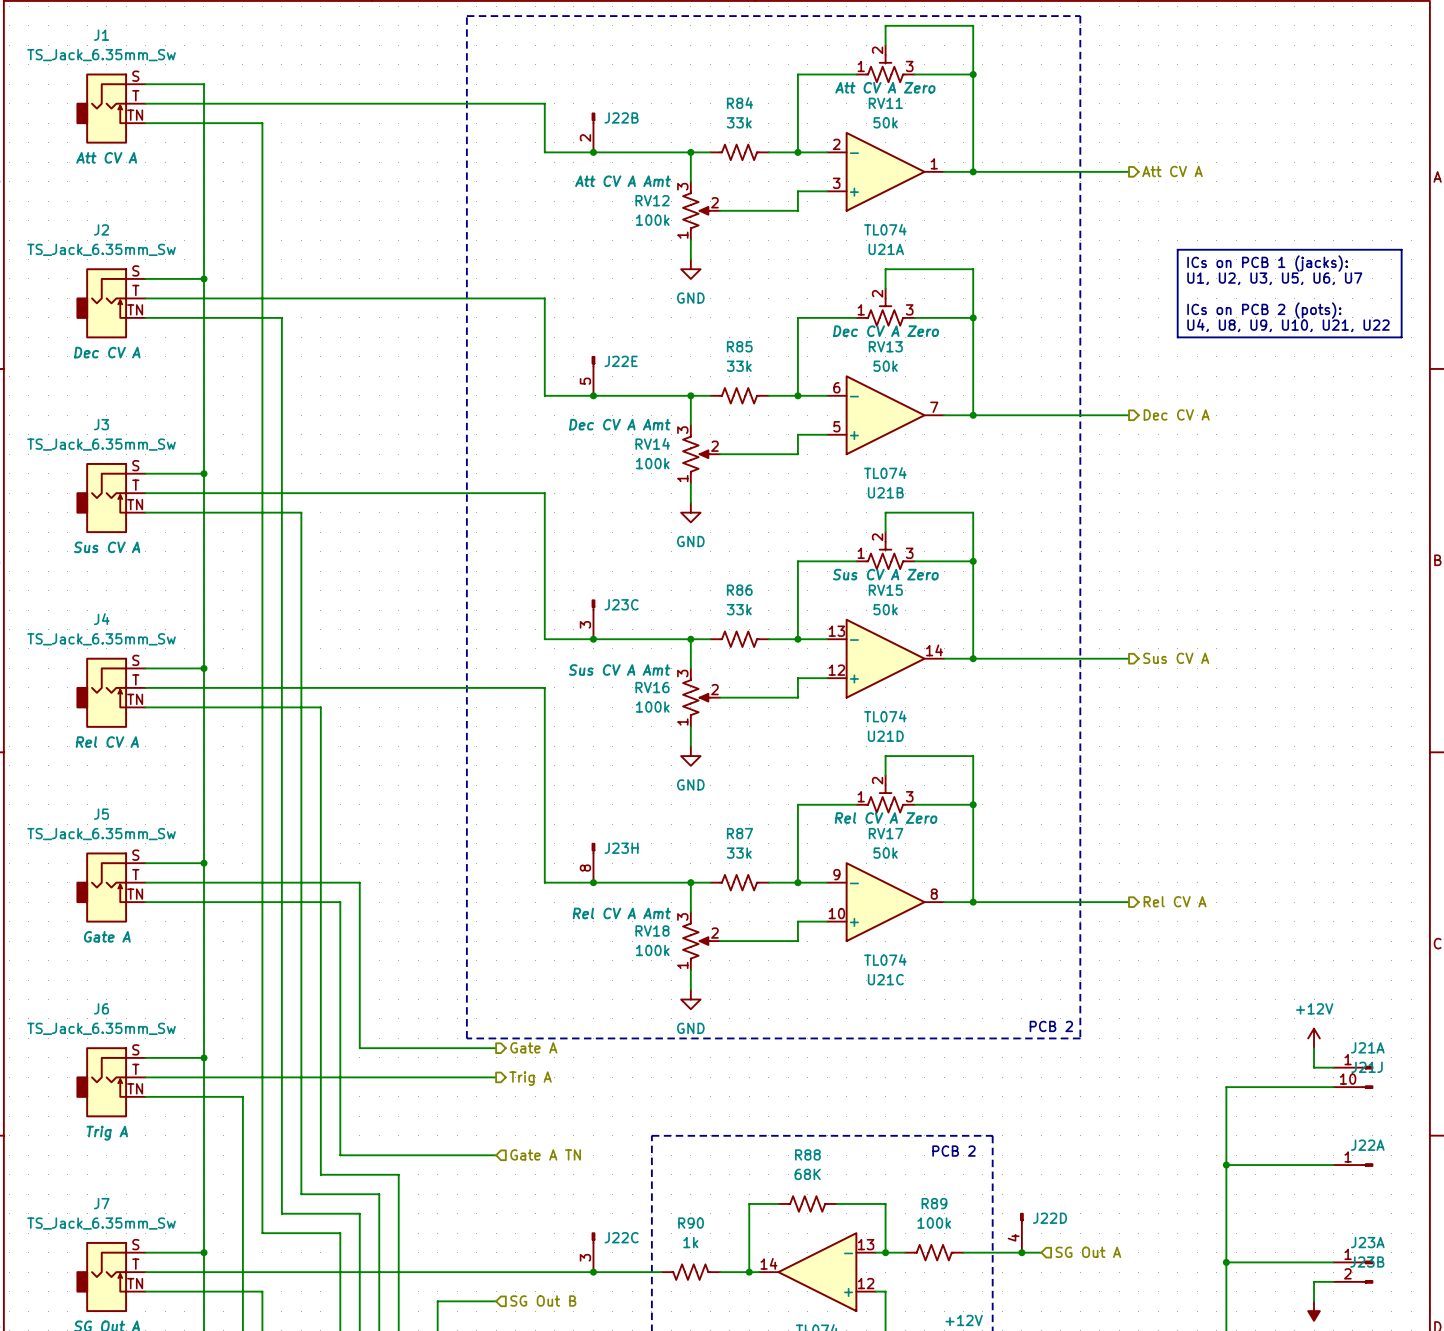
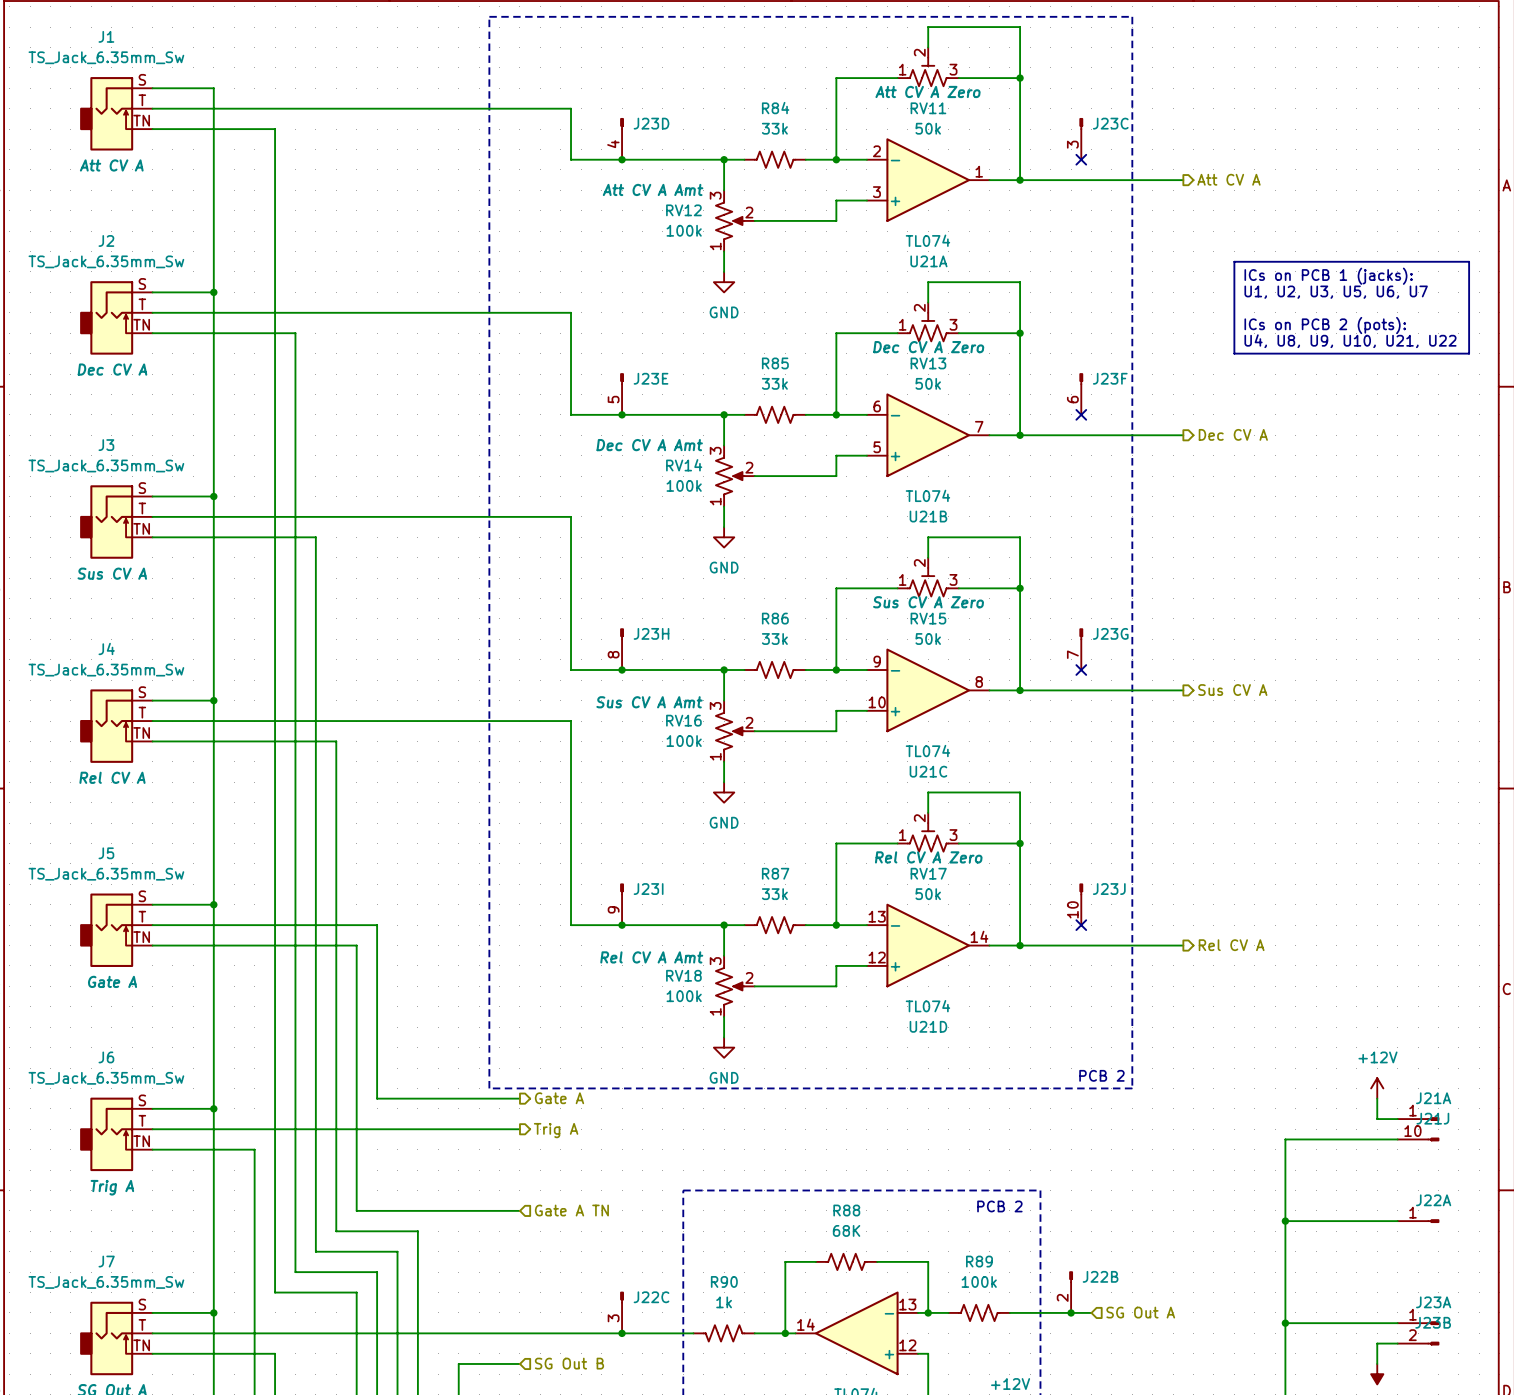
J22B position: (593, 132) -> (1071, 1292)
J23D: none -> (622, 139)
no-connect mark: none -> (1081, 159)
J22E name: J22E (621, 361) -> J23E (651, 378)
J23F: none -> (1081, 394)
no-connect mark: none -> (1081, 414)
J23C position: (593, 619) -> (1081, 139)
J23G: none -> (1081, 649)
no-connect mark: none -> (1081, 670)
U21D position: (885, 658) -> (928, 945)
J23H position: (593, 862) -> (622, 649)
J23I: none -> (622, 904)
J23J: none -> (1081, 904)
no-connect mark: none -> (1081, 925)
U21C position: (885, 902) -> (928, 690)
J22D: (1021, 1232) -> none

